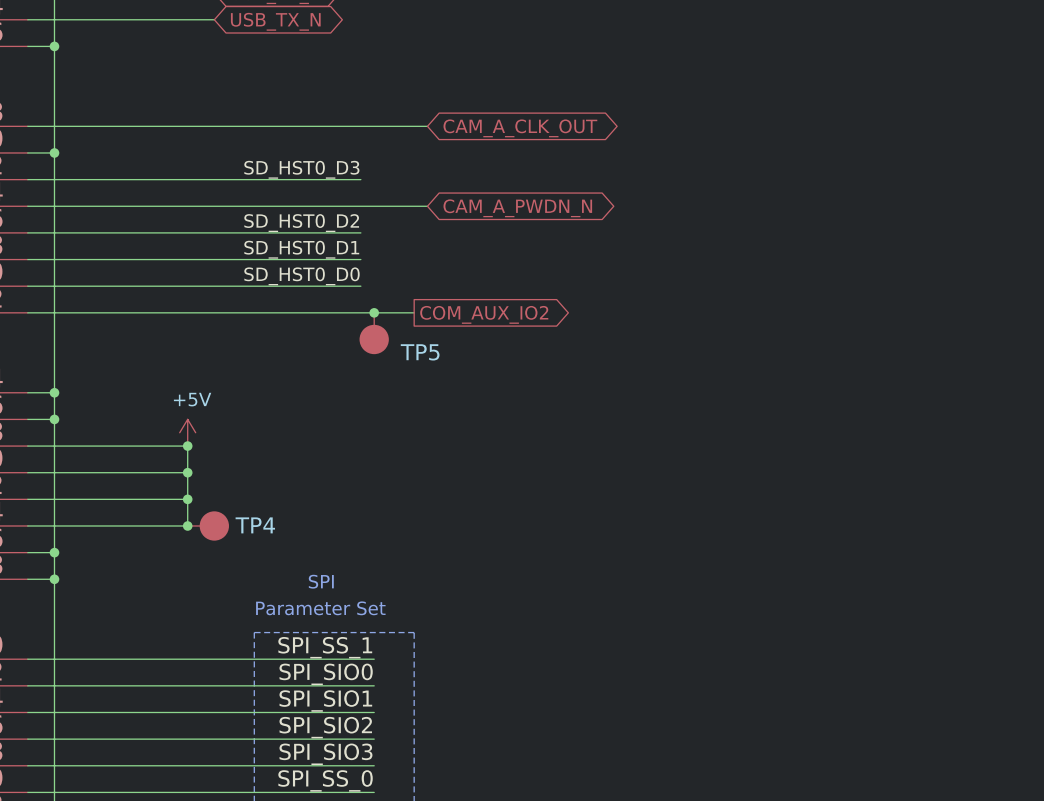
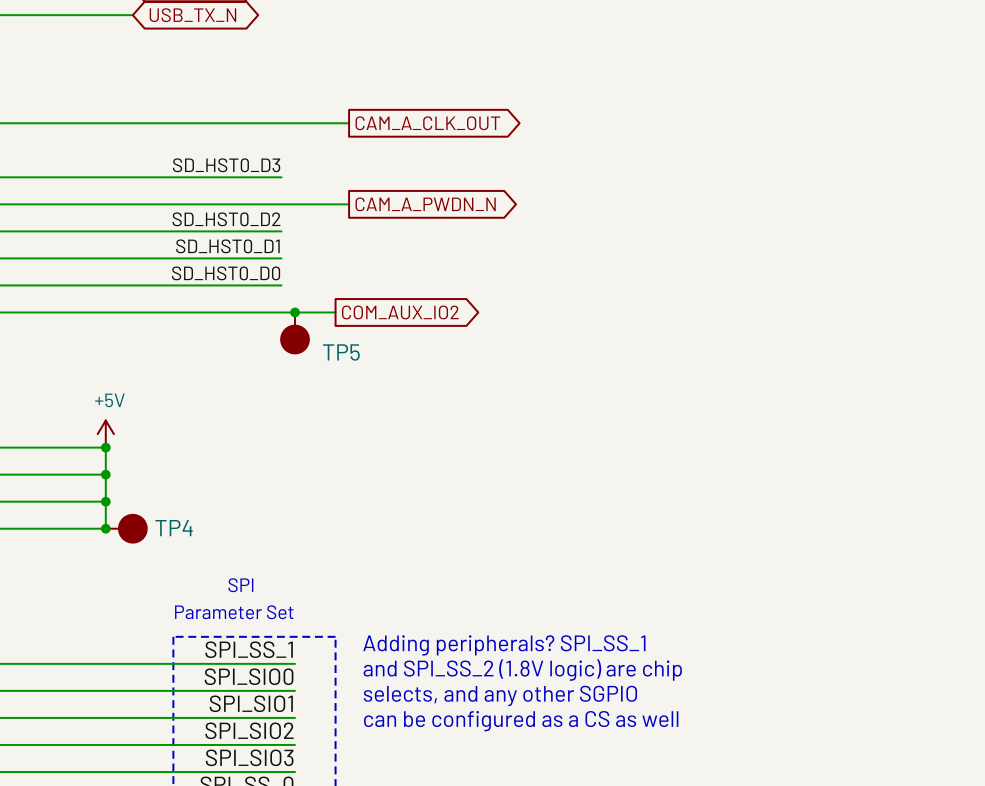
global label shape: bidirectional (520, 128) -> output (427, 123)
global label shape: bidirectional (517, 208) -> output (425, 204)
text: none -> Adding peripherals? SPI_SS_1 (504, 645)
text: none -> and SPI_SS_2 (1.8V logic) are chip (522, 670)
text: none -> selects, and any other SGPIO (500, 695)
text: none -> can be configured as a CS as well (521, 721)

